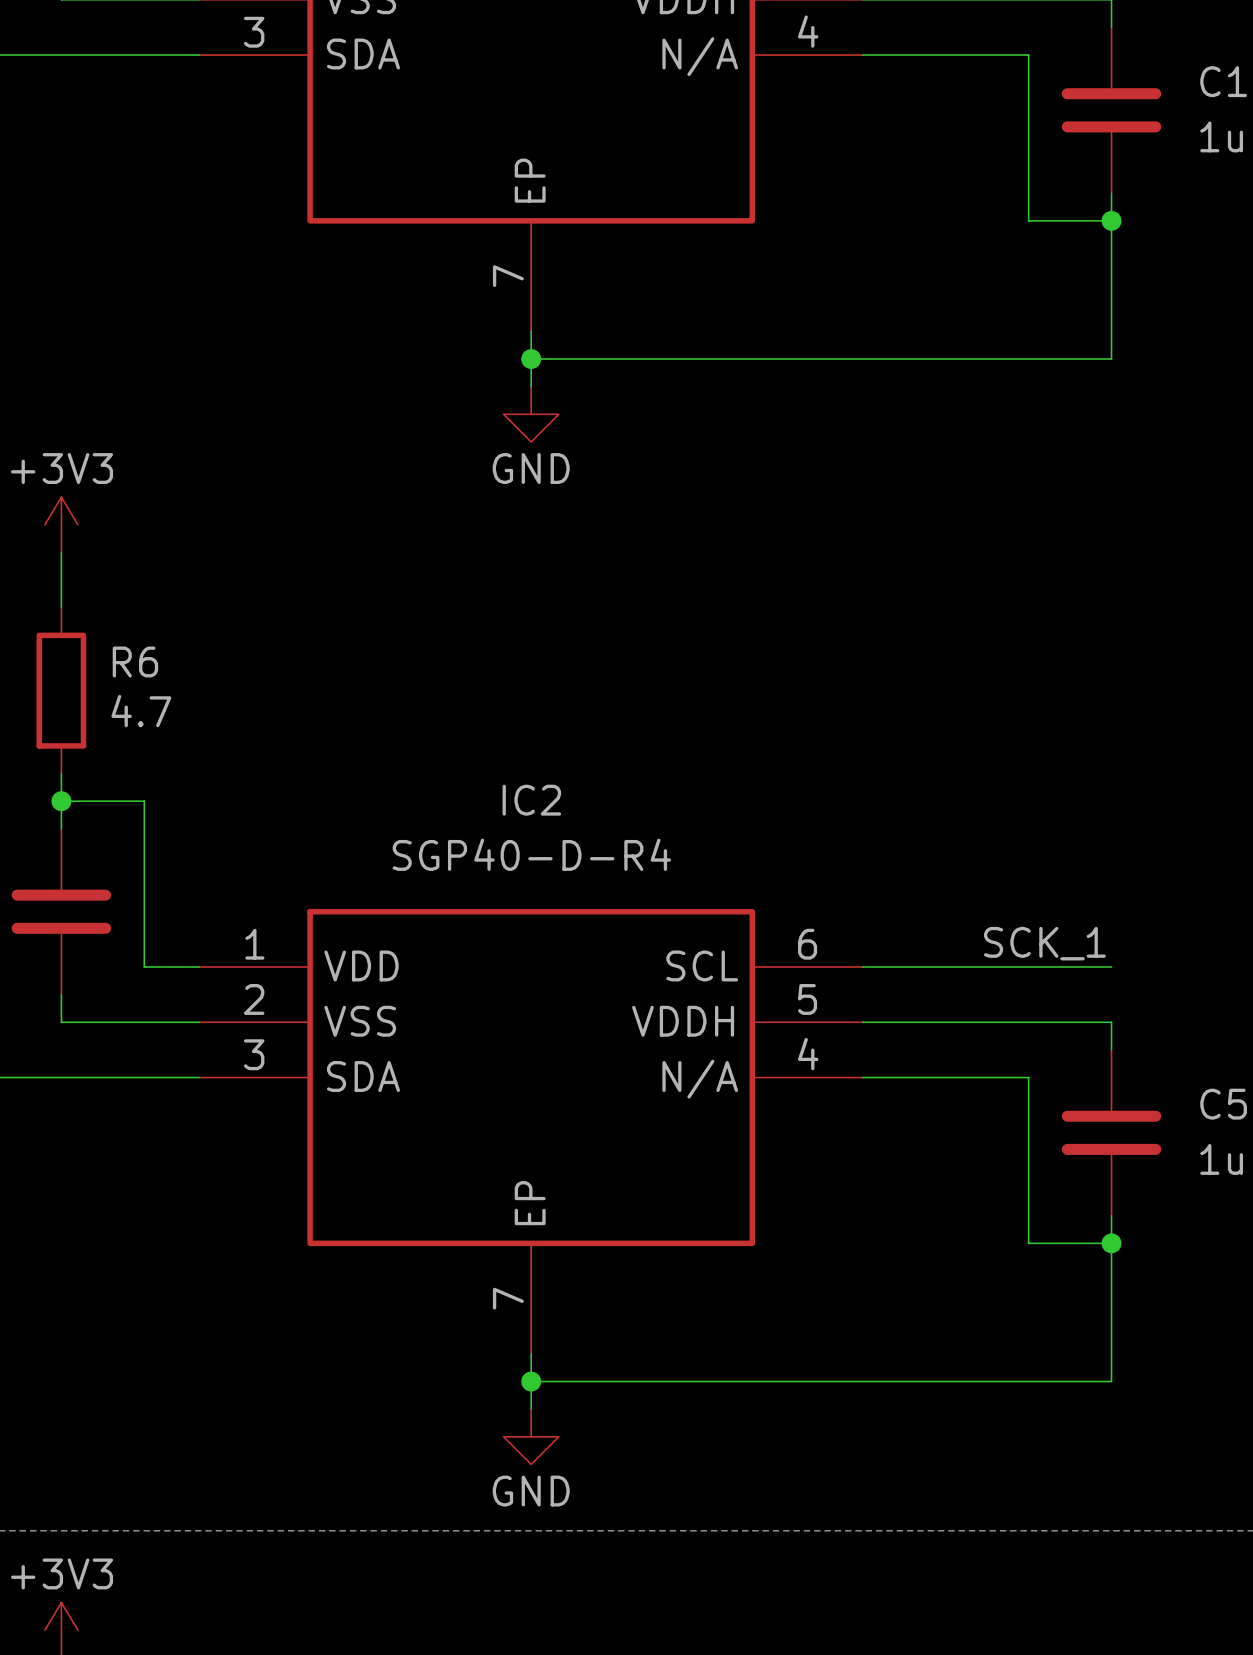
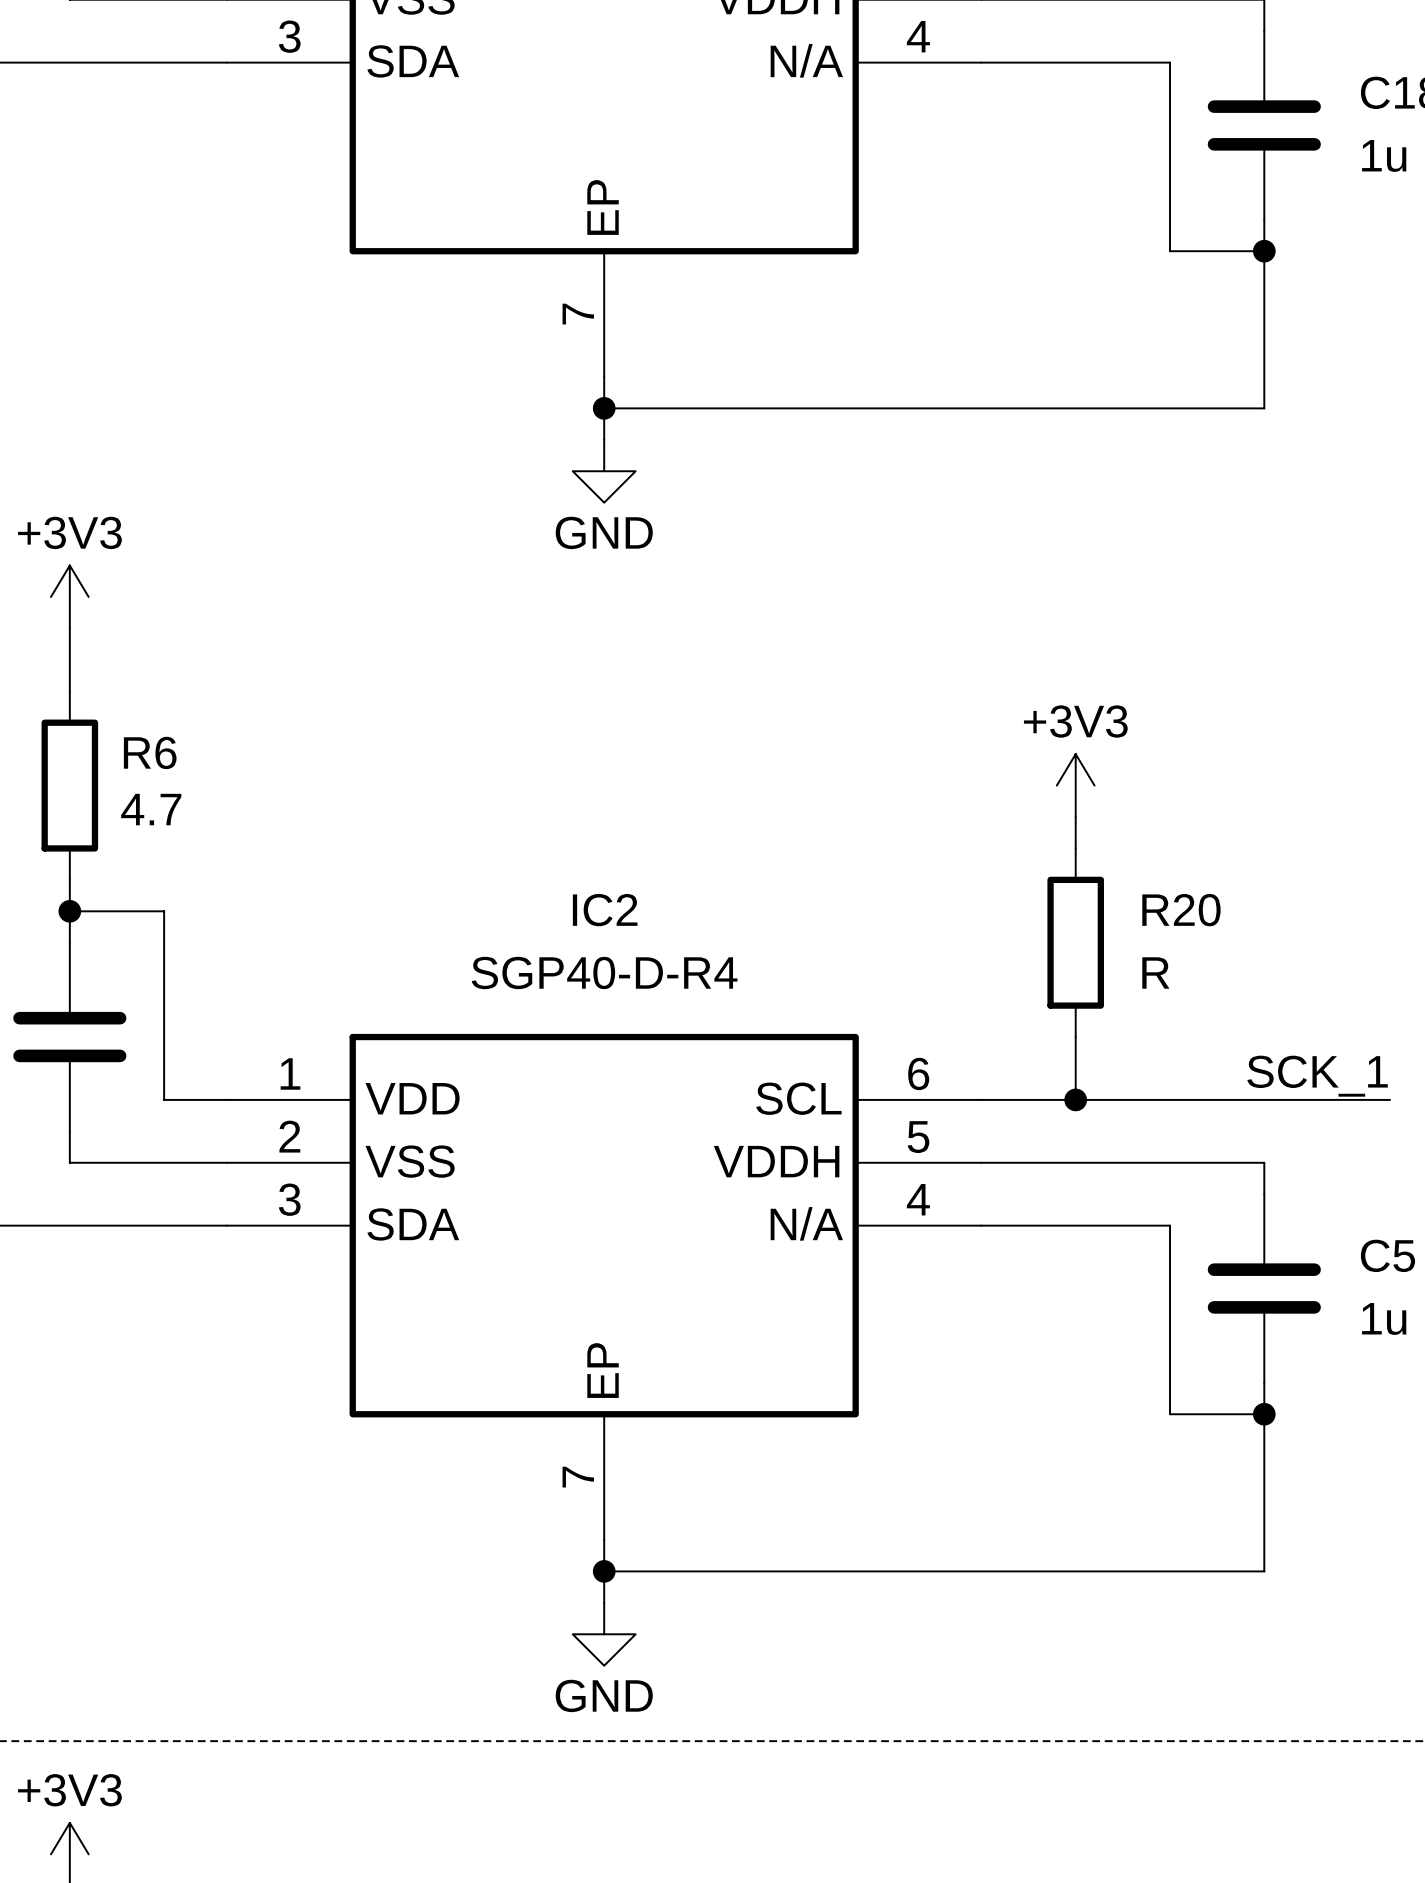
power symbol: none -> +3V3 (1075, 785)
wire: none -> (1075, 817) (1075, 848)
R20: none -> R (1075, 942)
wire: none -> (1075, 1037) (1075, 1099)
label position: SCK_1 (1044, 943) -> SCK_1 (1317, 1076)
junction: none -> (1075, 1099)
wire: none -> (1264, 1099) (1390, 1099)

